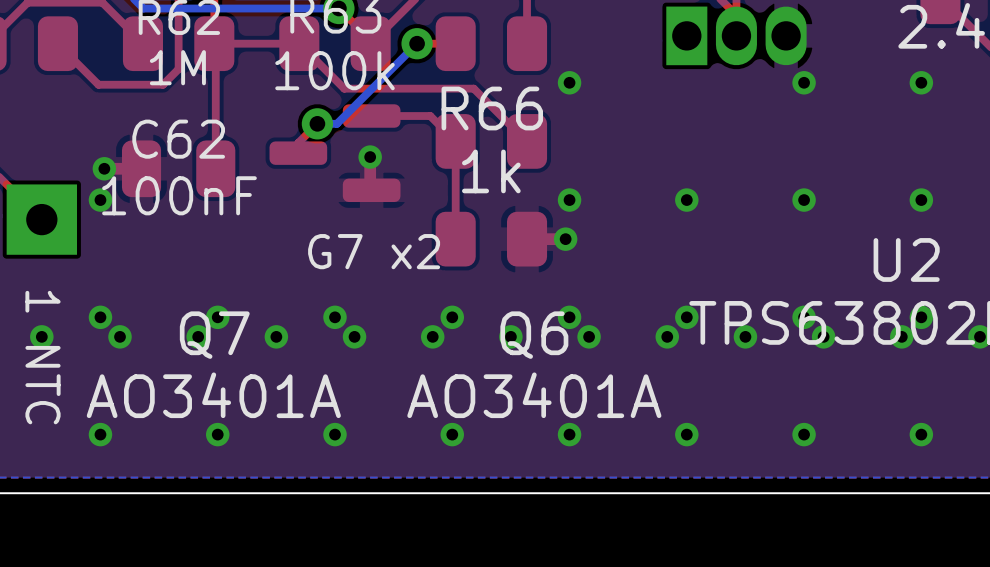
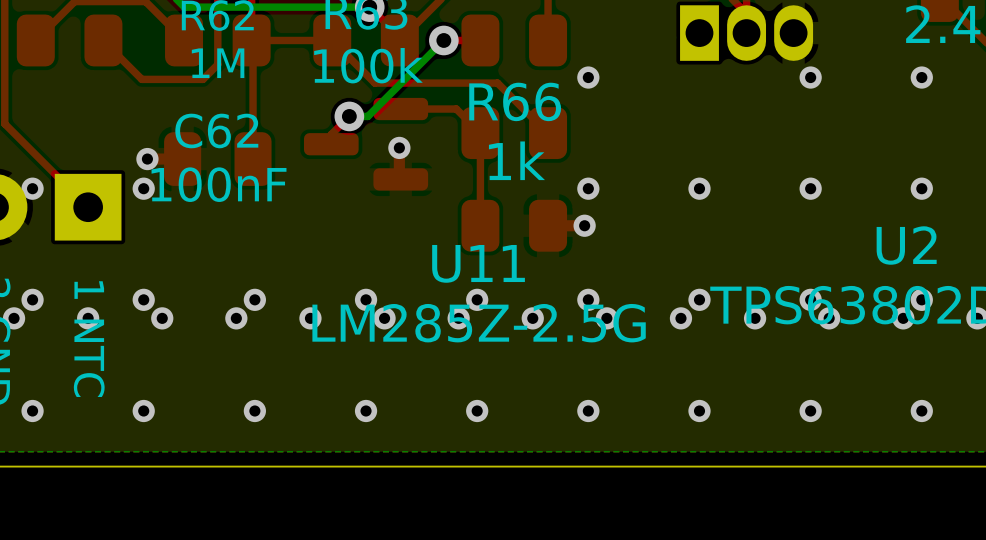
text: G7 x2 (374, 251) -> none
text: none -> U11 (478, 263)
text: Q7 (214, 335) -> none
text: Q6 (534, 335) -> none
text: none -> LM285Z-2.5G (479, 323)
text: AO3401A (213, 395) -> none
text: AO3401A (534, 395) -> none

